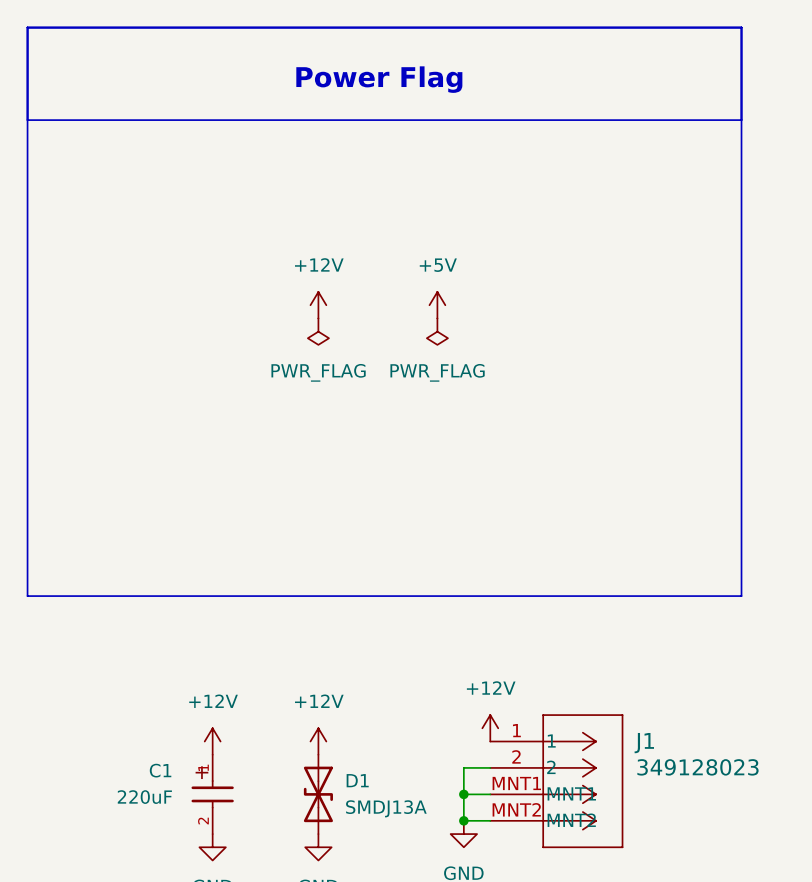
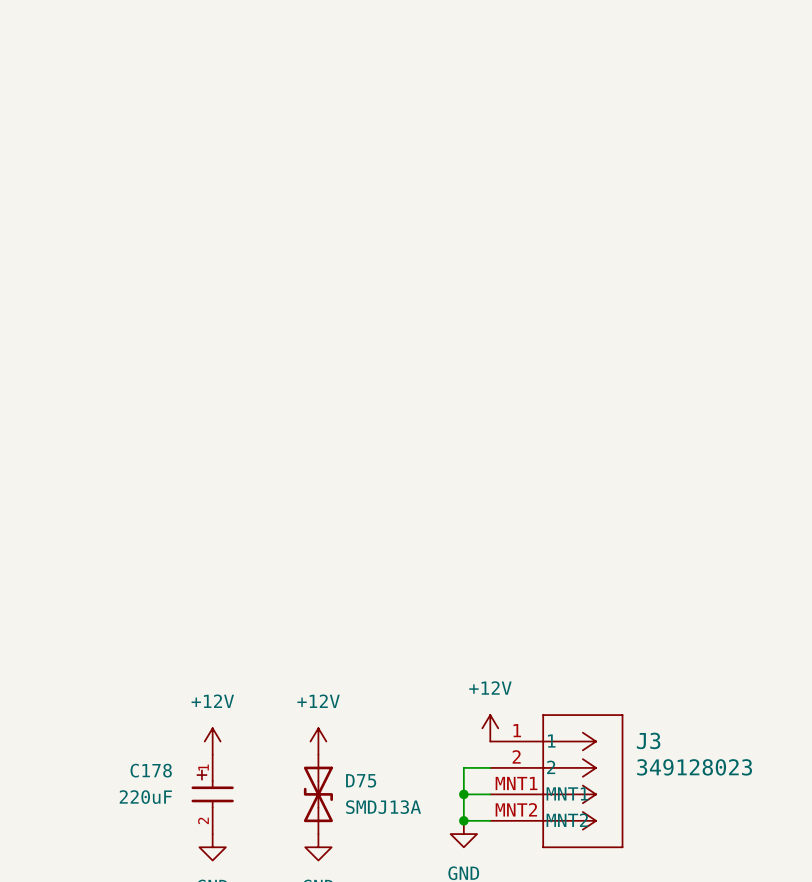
line: (27, 27) (741, 27) (741, 596) (27, 596) (27, 27) -> none
text: Power Flag (379, 79) -> none
line: (27, 120) (741, 120) -> none
power symbol: +12V (318, 305) -> none
power symbol: +5V (437, 305) -> none
power symbol: PWR_FLAG (318, 331) -> none
power symbol: PWR_FLAG (437, 331) -> none
J1 name: J1 (644, 743) -> J3 (648, 740)
C1 name: C1 (160, 770) -> C178 (151, 770)
D1 name: D1 (357, 780) -> D75 (361, 780)

